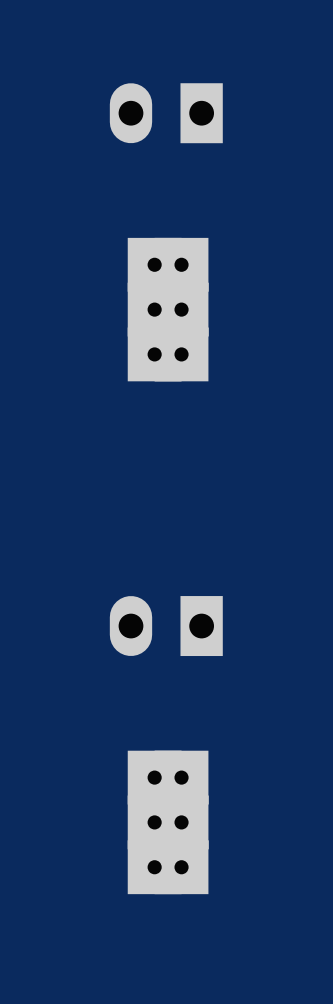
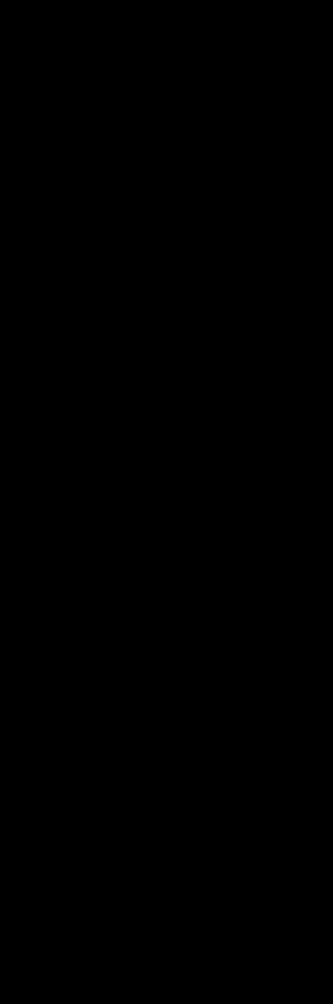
part: (166, 113) -> none
part: (168, 309) -> none
part: (166, 626) -> none
part: (168, 822) -> none

